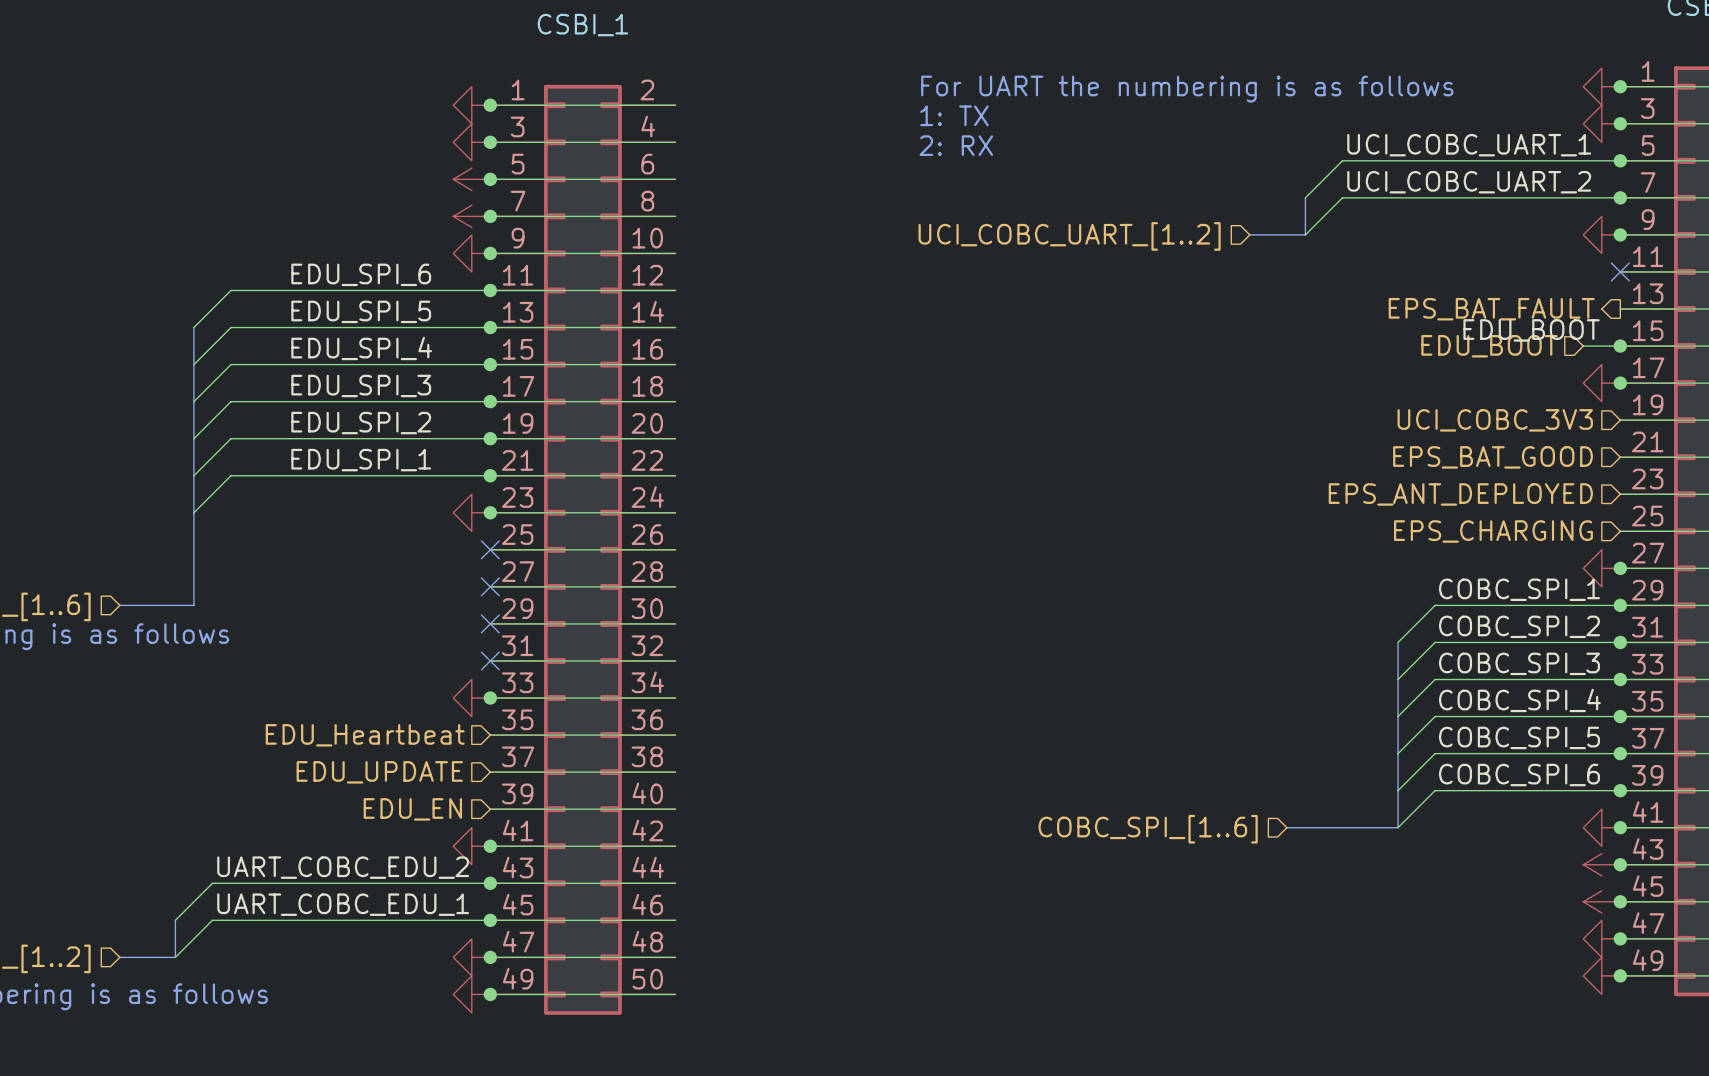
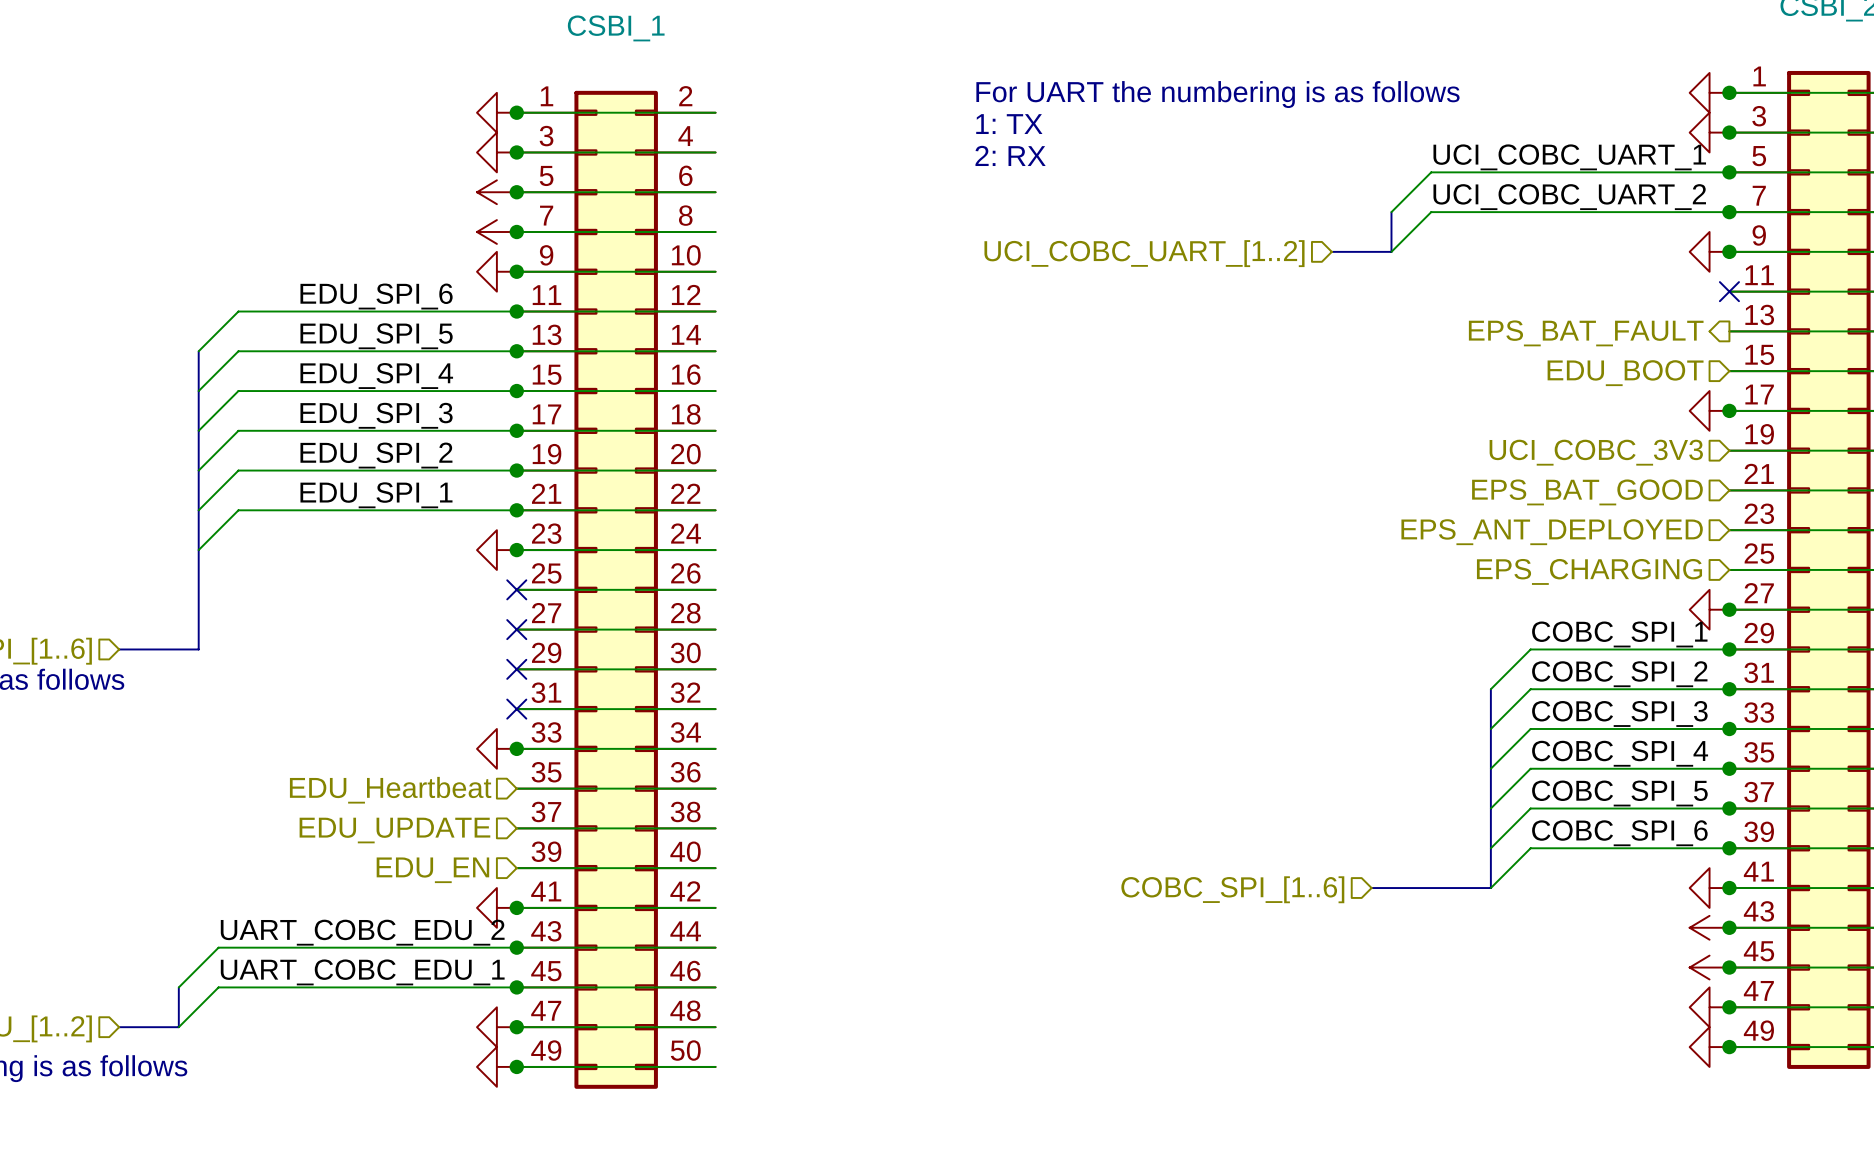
label: EDU_BOOT (1531, 330) -> none
hierarchical label position: EDU_BOOT (1489, 346) -> EDU_BOOT (1625, 373)
wire: (1583, 346) (1620, 346) -> none
junction: (1620, 346) -> none

